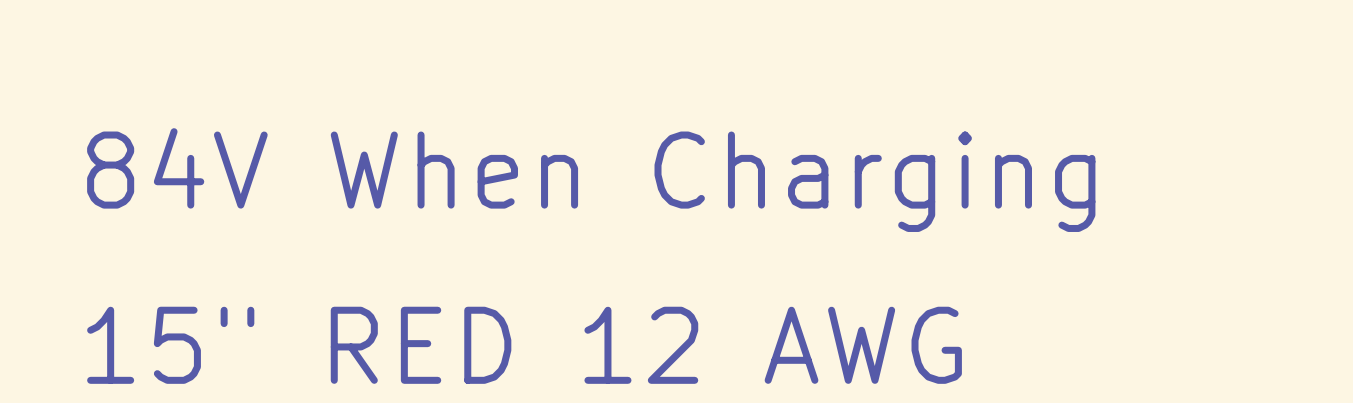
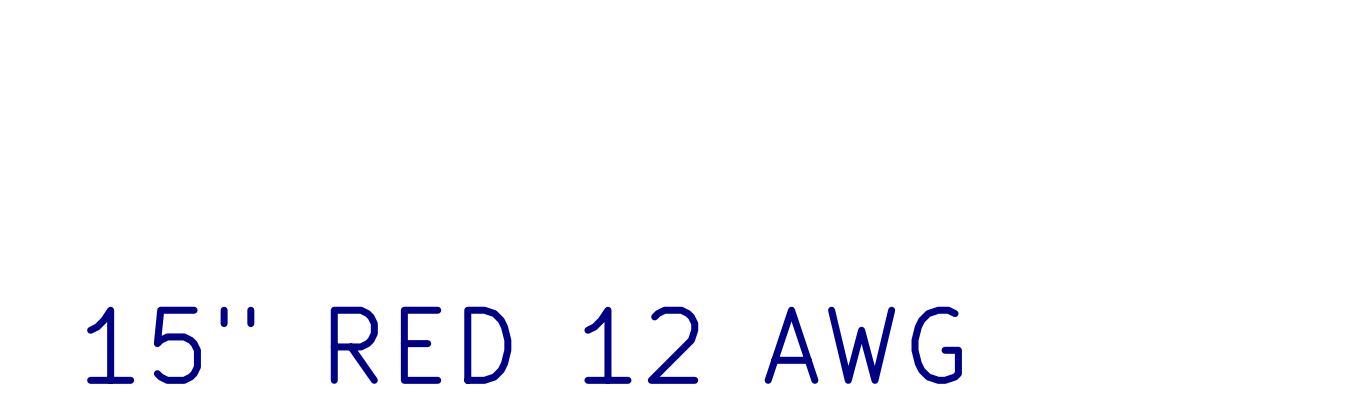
text: 84V When Charging (591, 180) -> none

